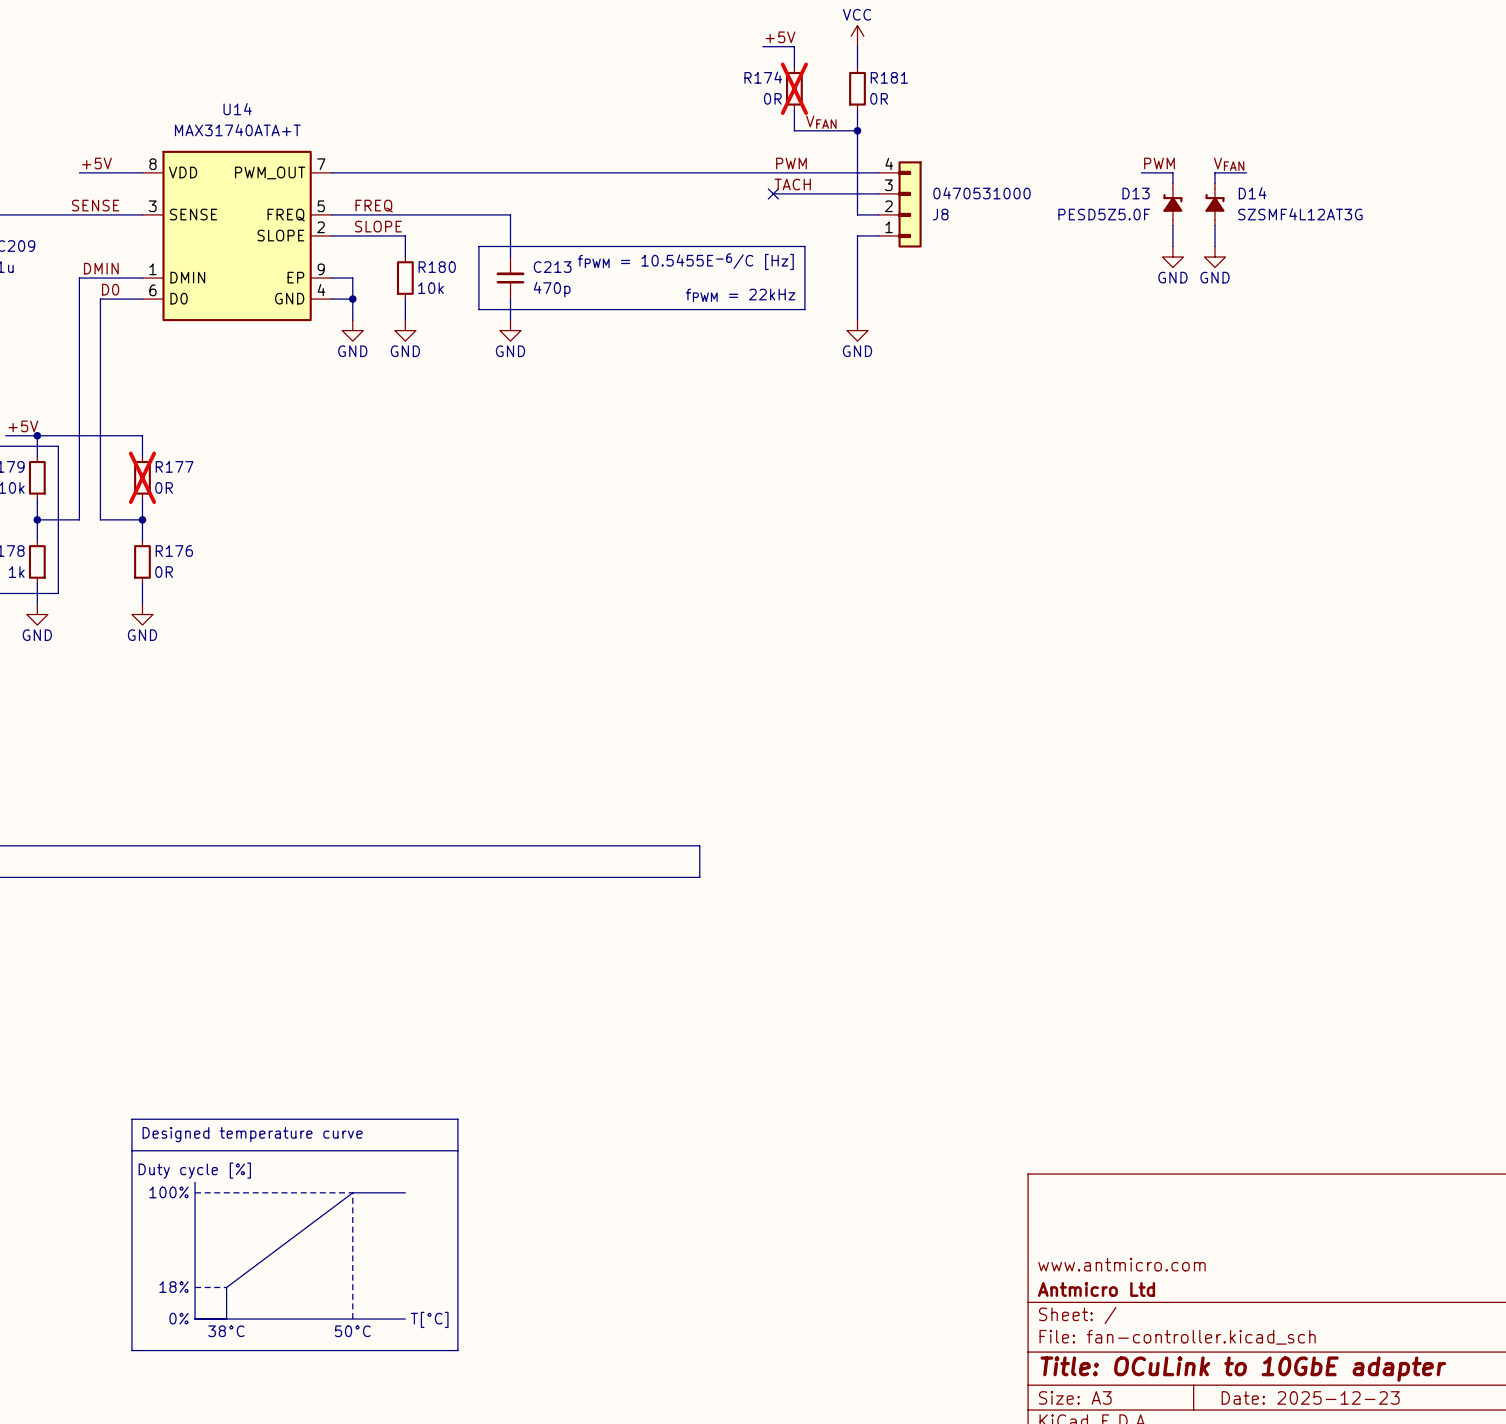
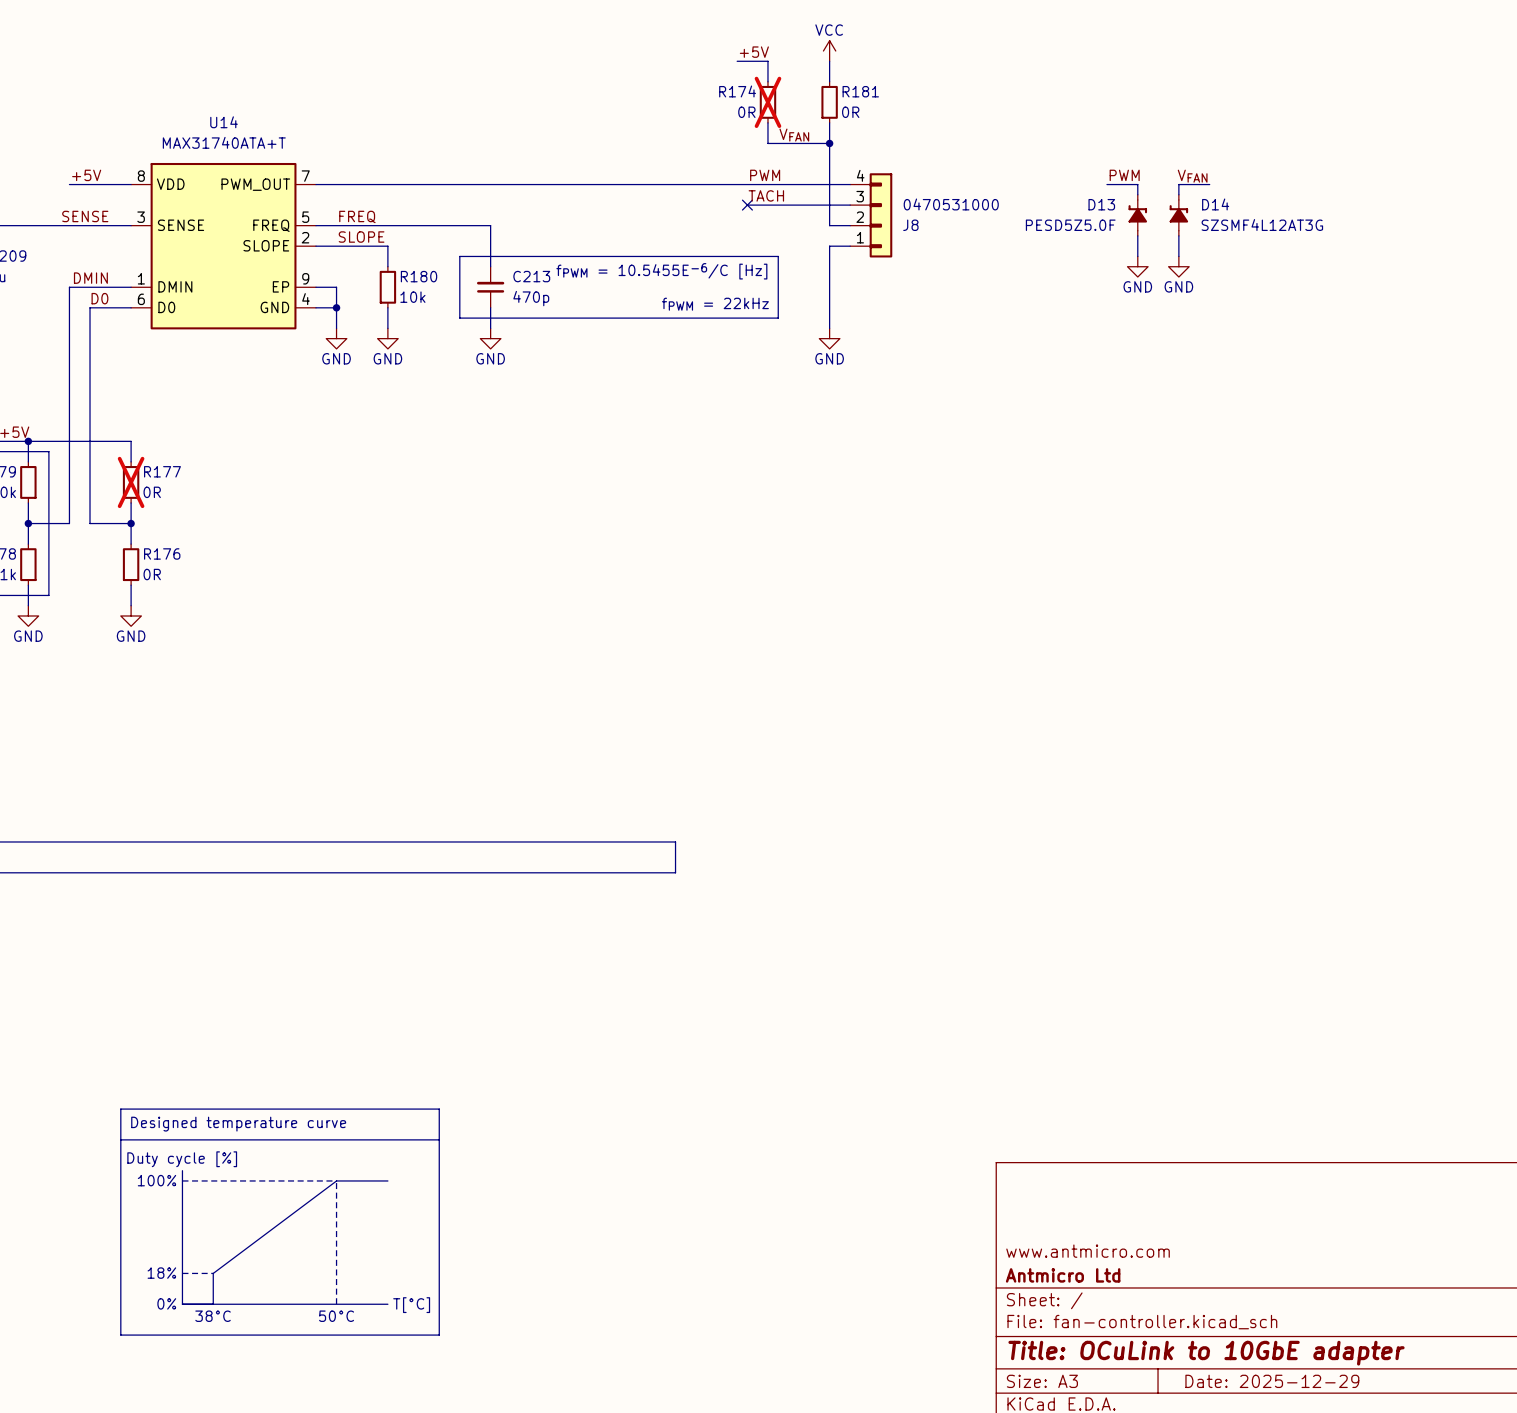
title block: Date: 2025-12-23 (1310, 1397) -> Date: 2025-12-29 (1272, 1381)

